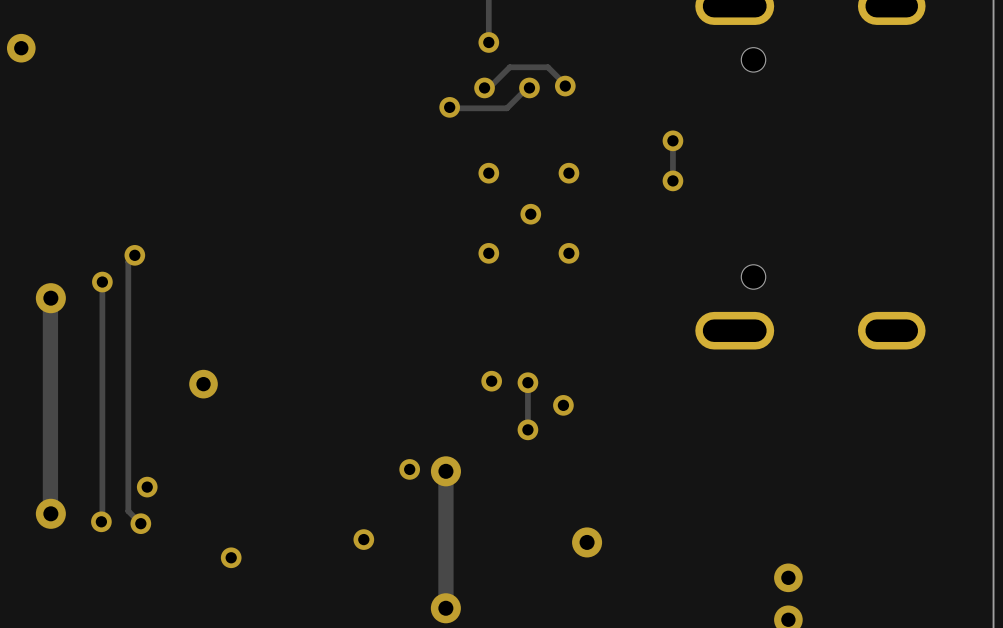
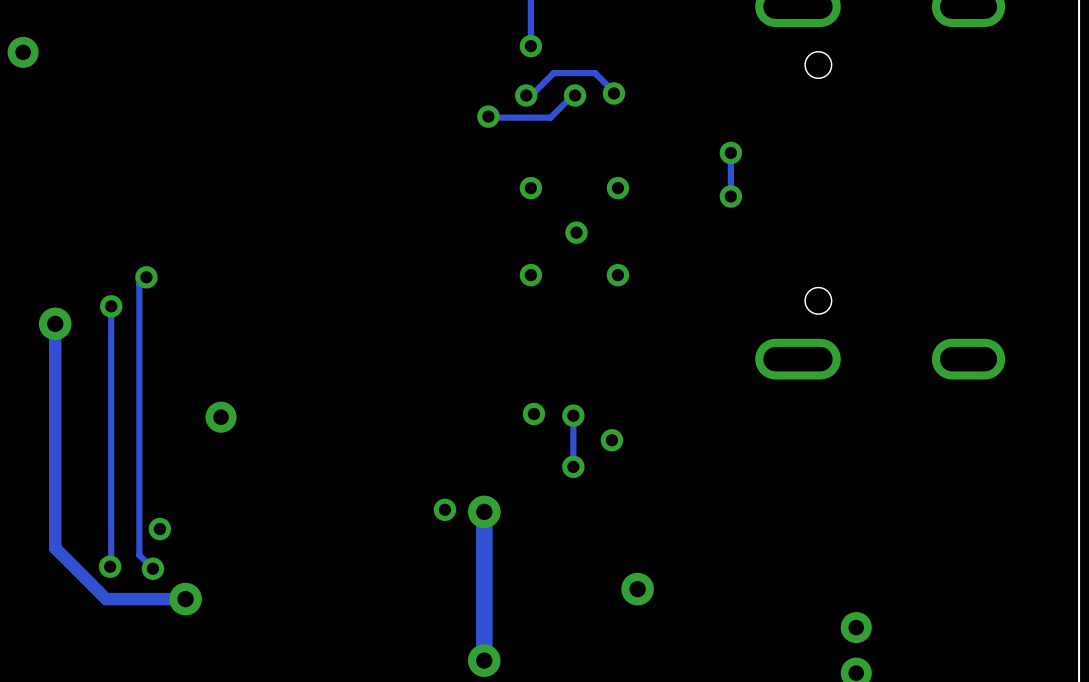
track: (50, 298) (50, 513) -> (55, 323) (55, 548) (106, 599) (185, 599)
via position: (50, 513) -> (185, 599)
via: (363, 539) -> none
via: (231, 557) -> none

